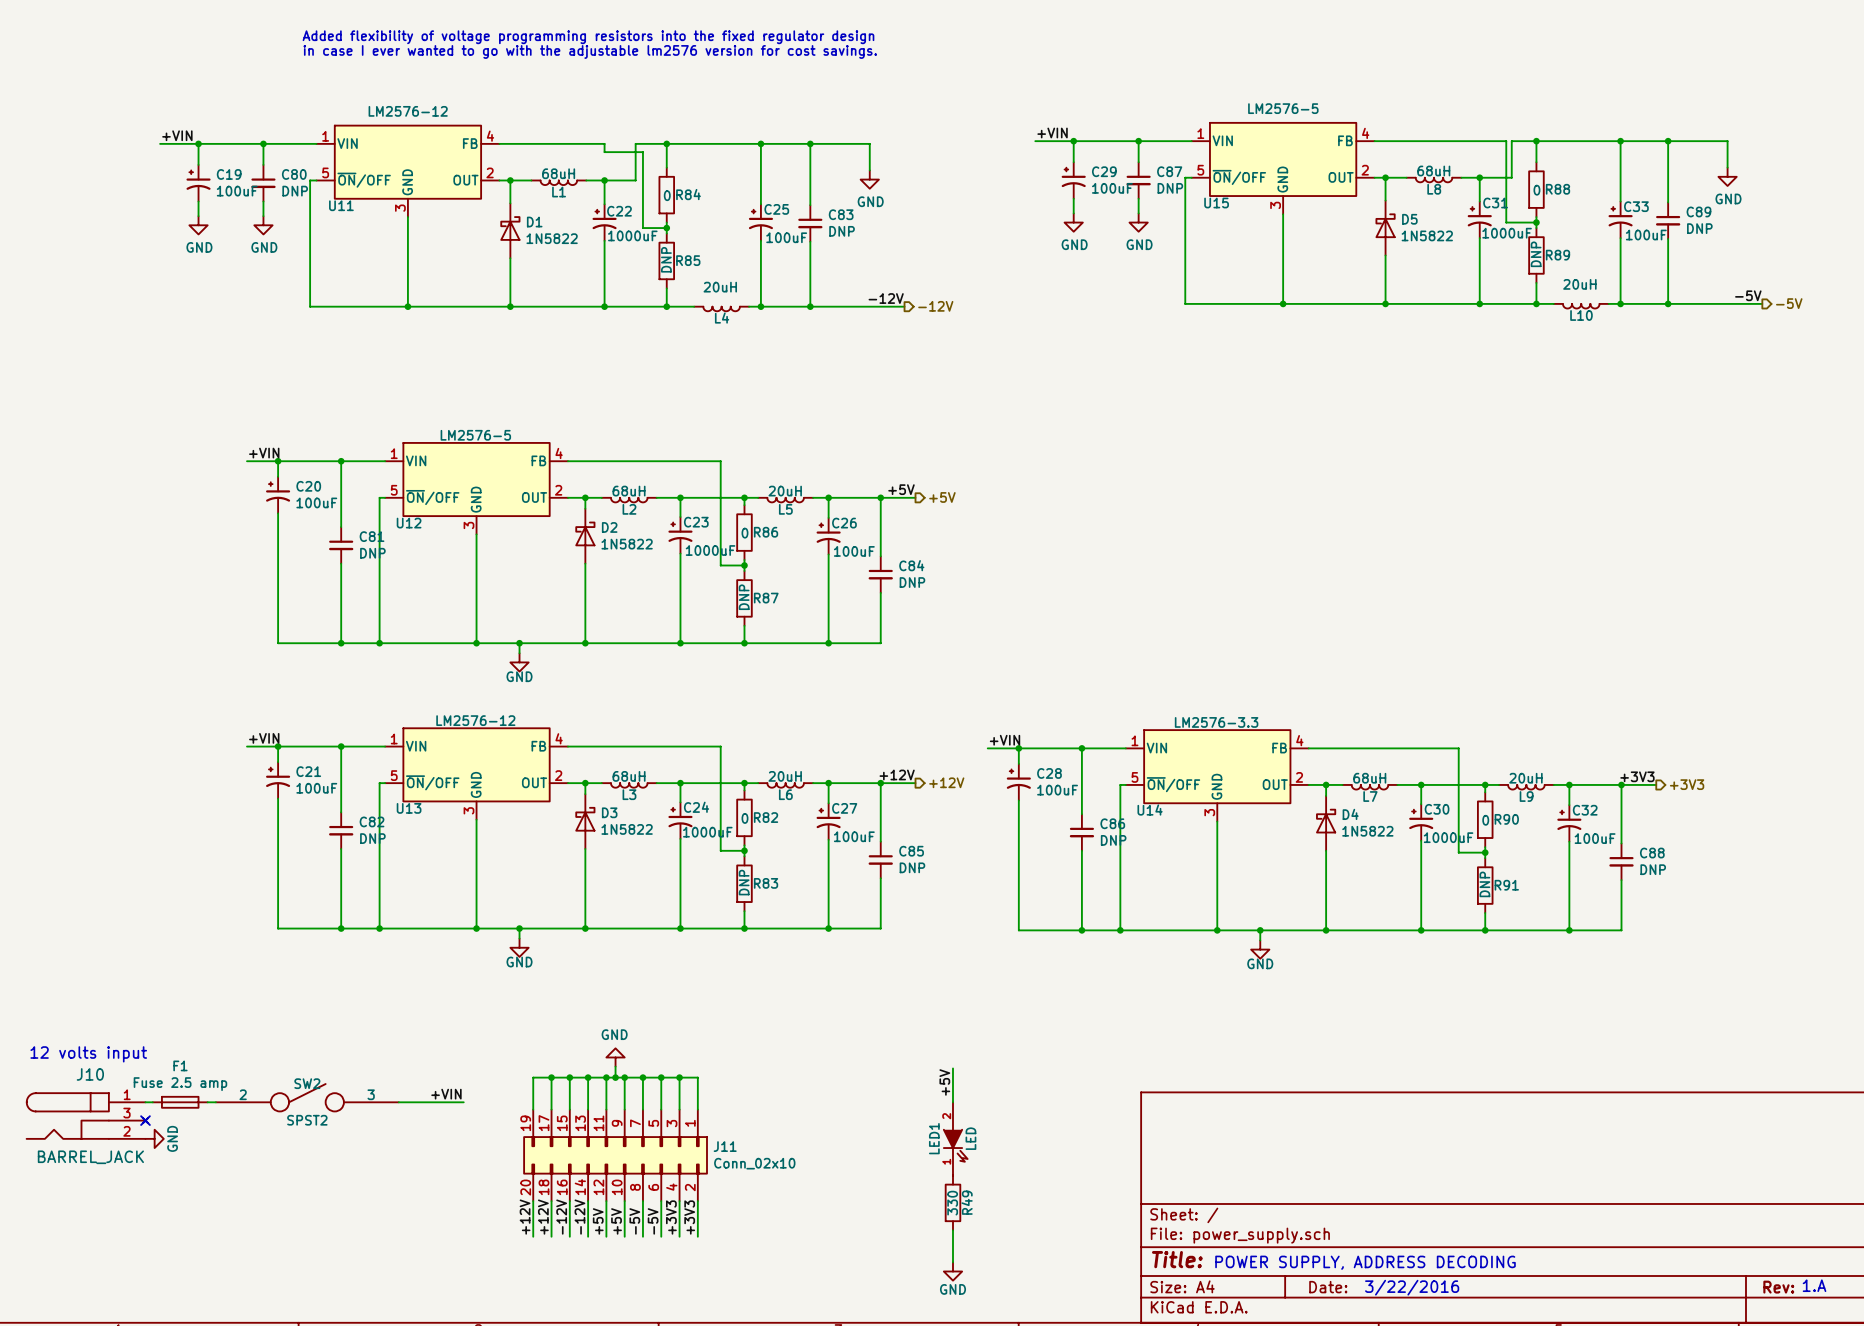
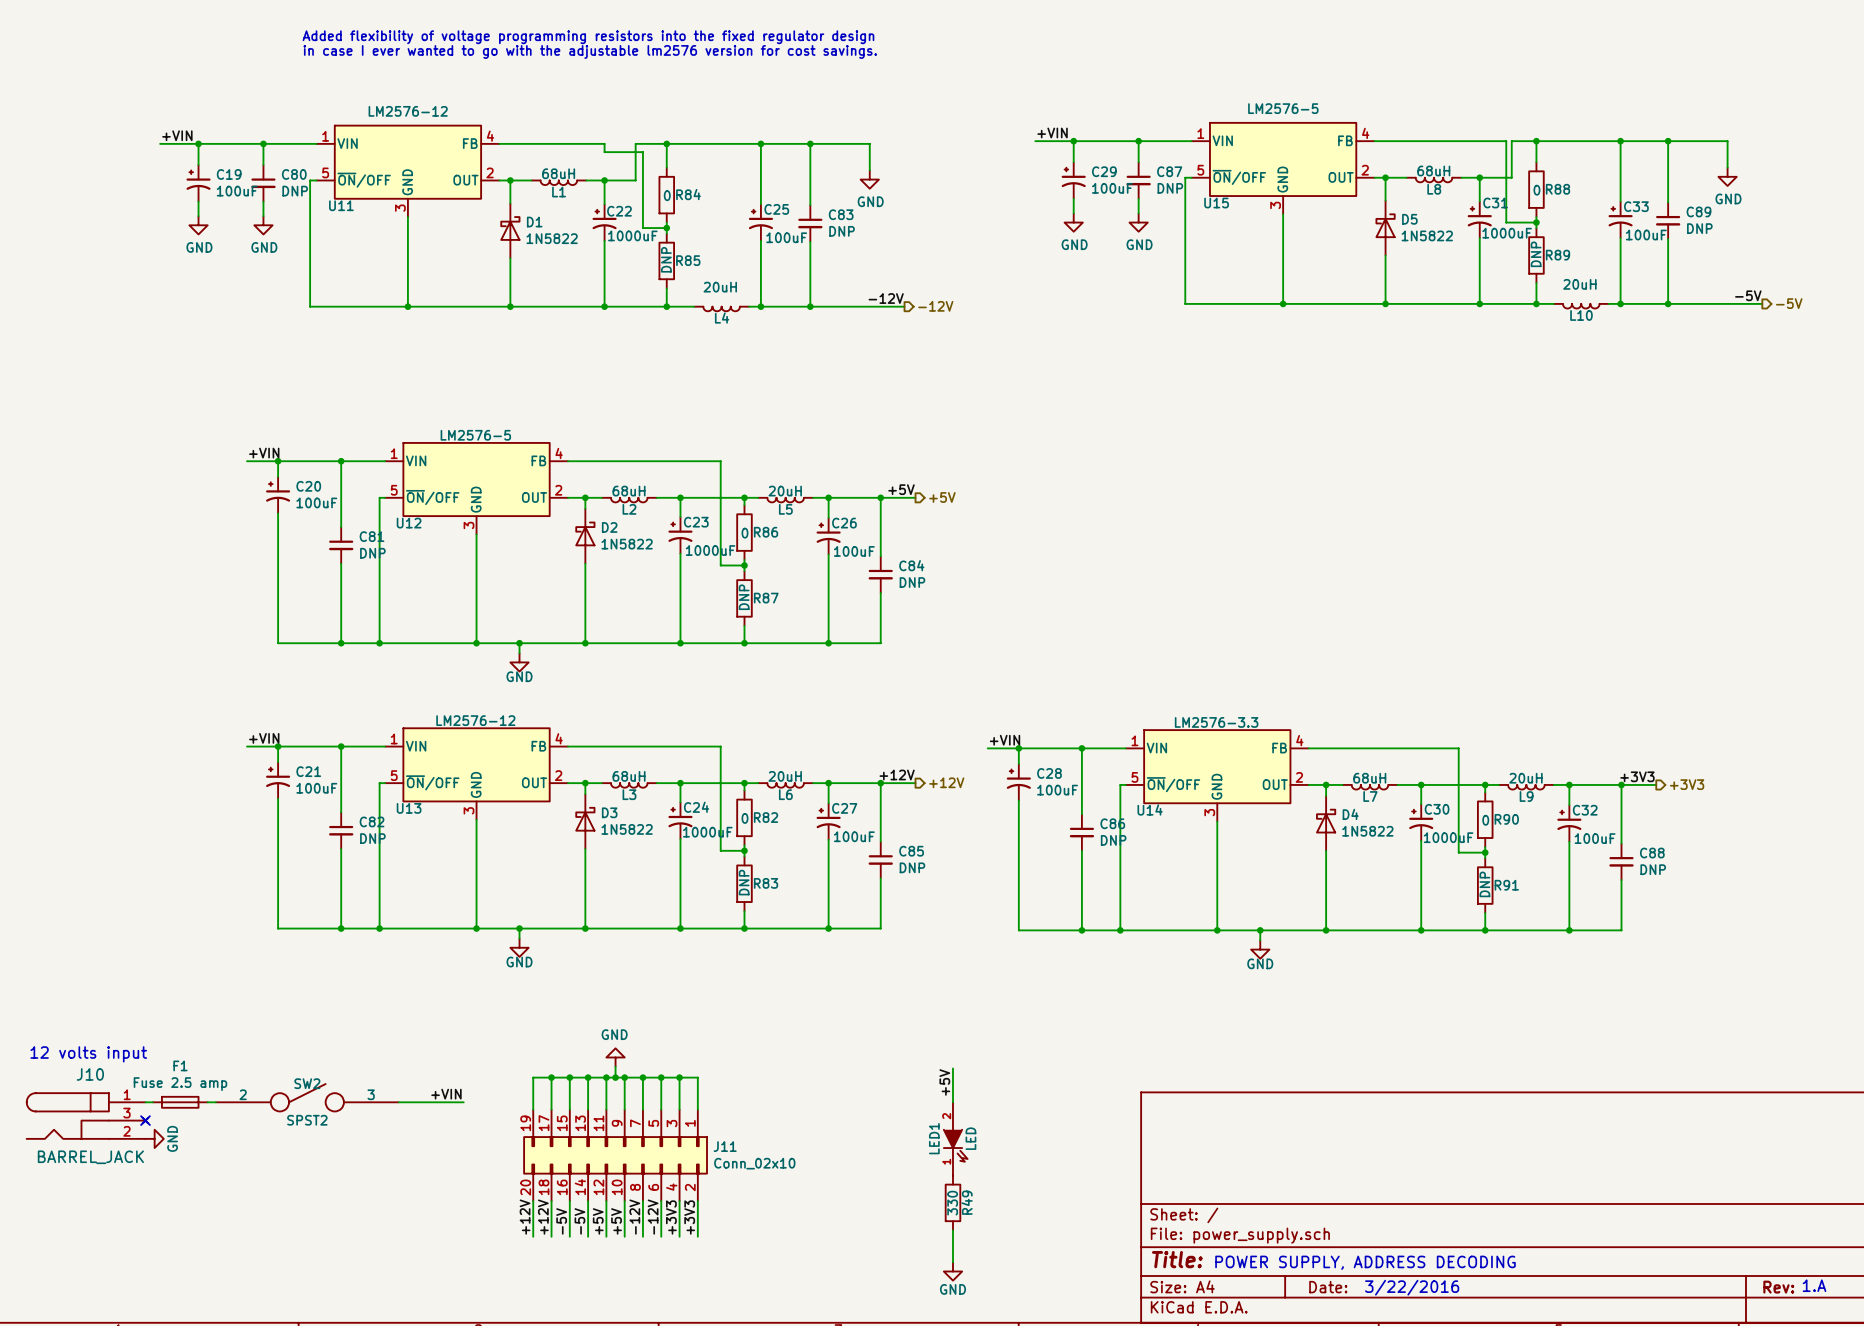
label: -12V (561, 1217) -> -5V (561, 1221)
label: -12V (579, 1217) -> -5V (579, 1221)
label: -5V (634, 1221) -> -12V (634, 1217)
label: -5V (653, 1221) -> -12V (653, 1217)

